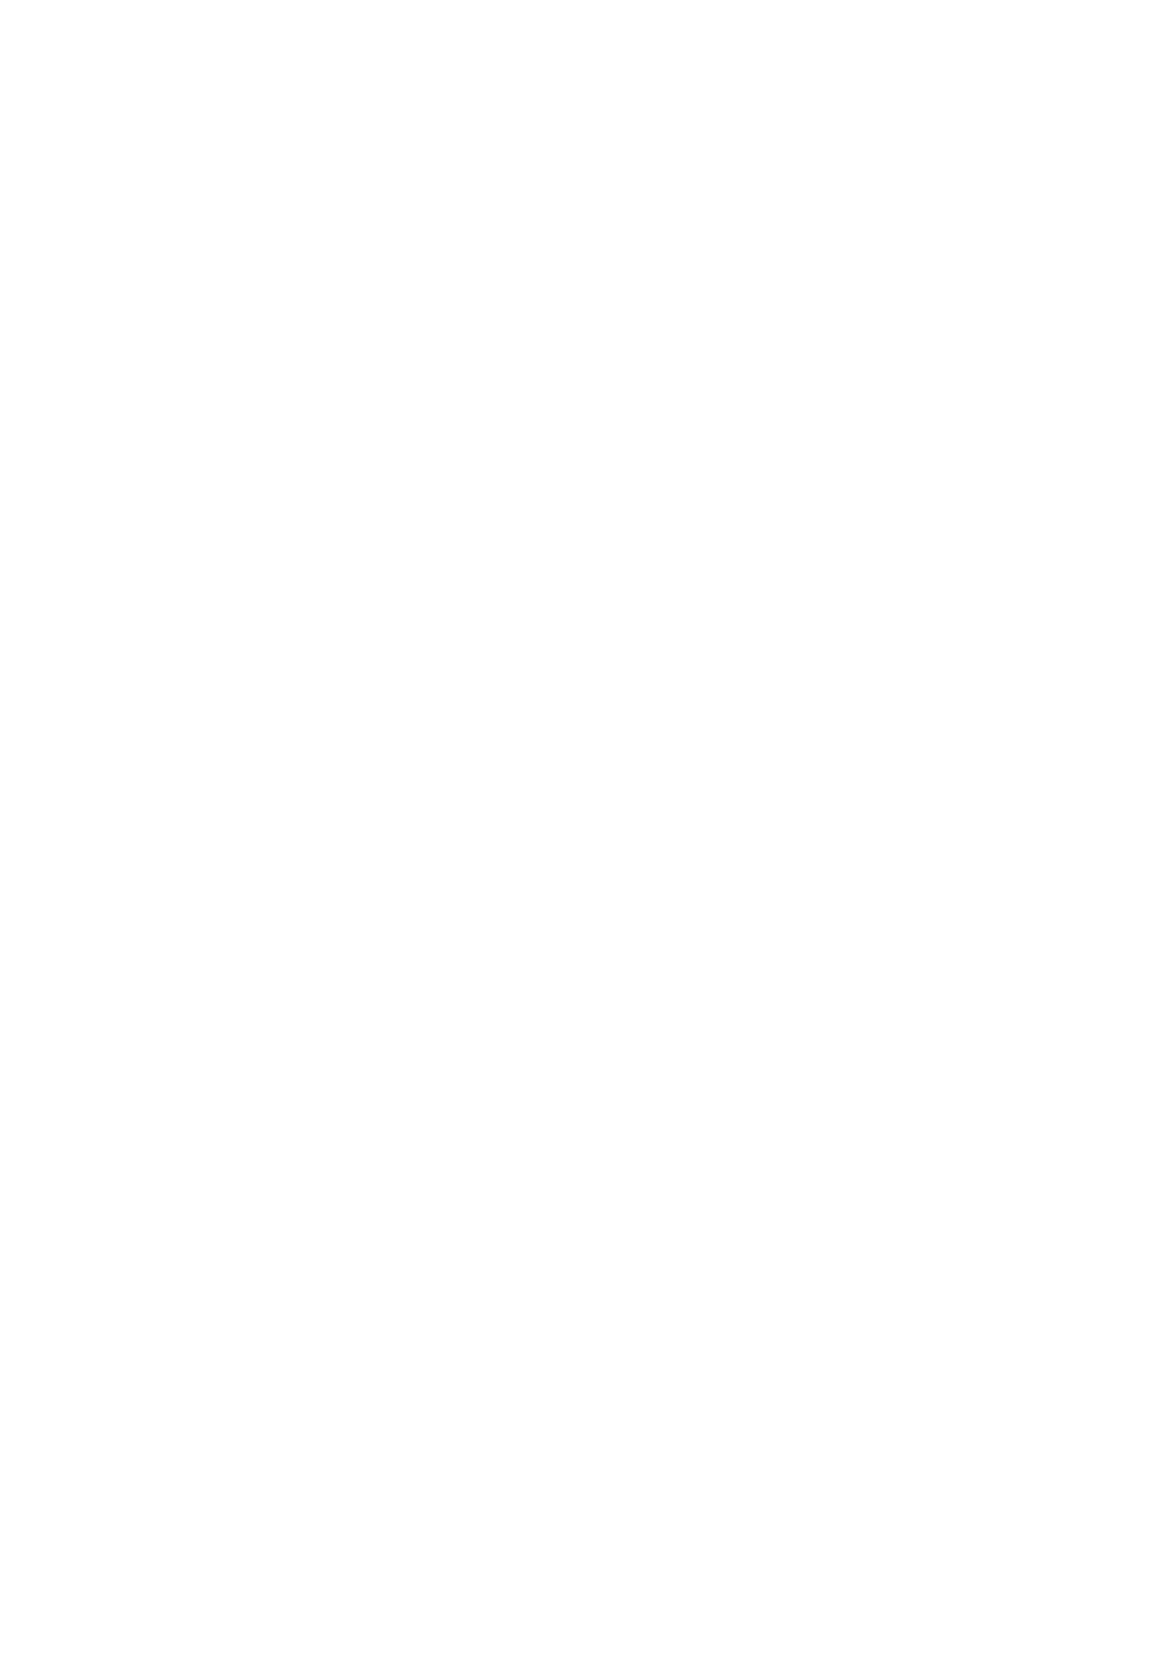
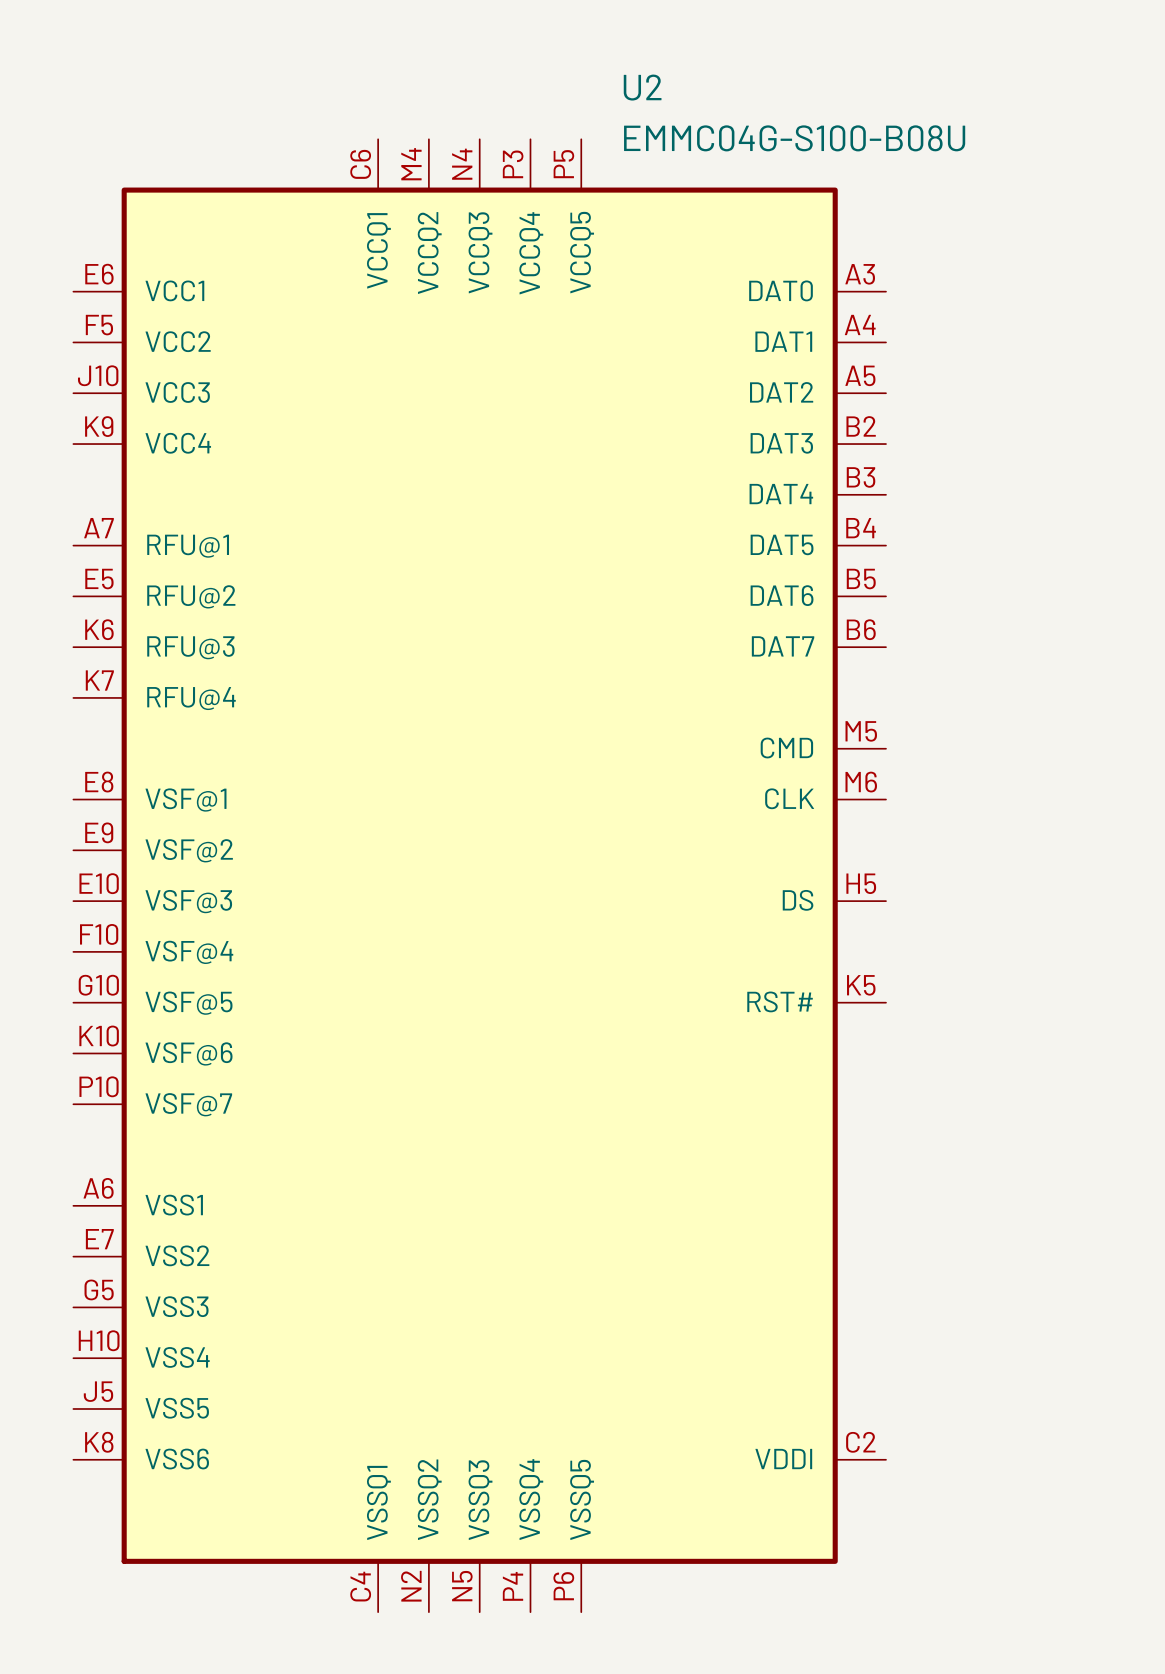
U2: none -> EMMC04G-S100-B08U (479, 875)

